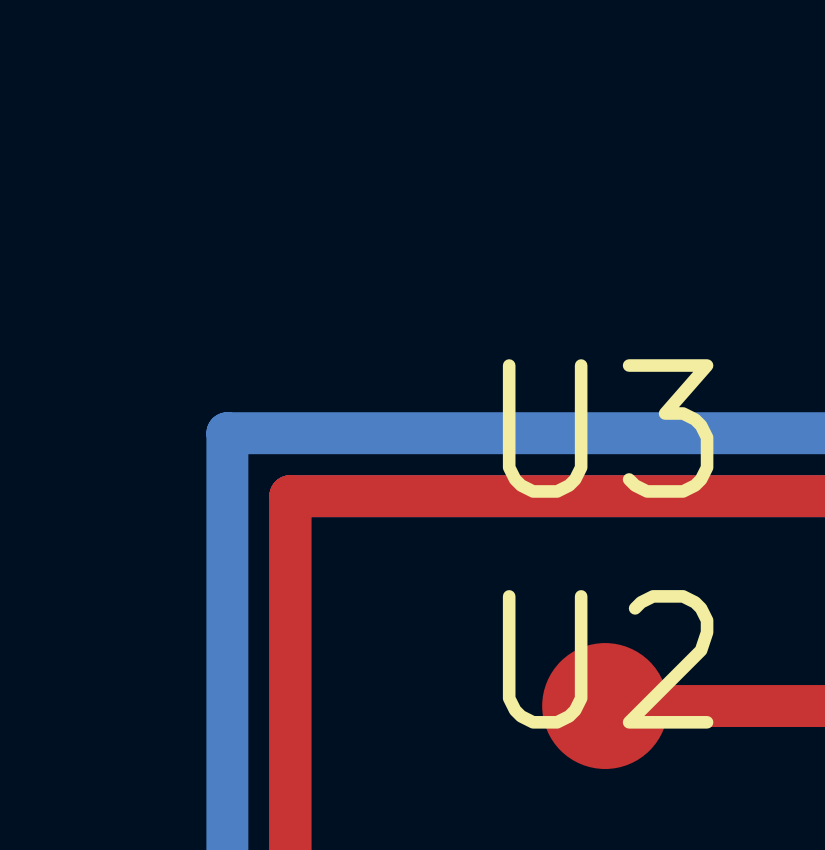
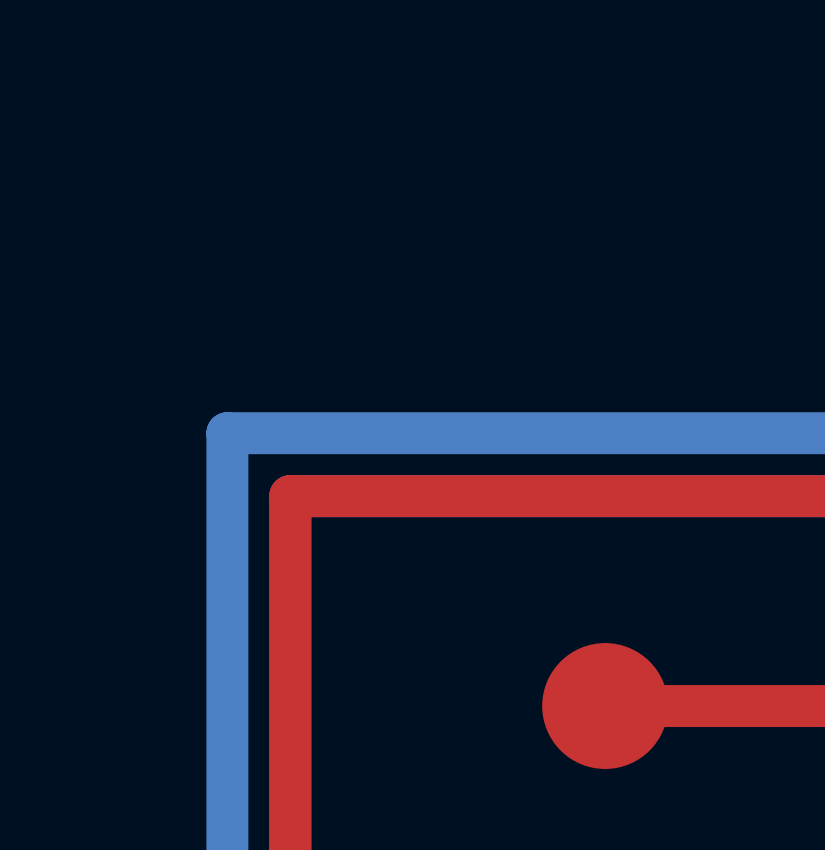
U3 name: U3 (608, 428) -> none
U2 name: U2 (608, 659) -> none

